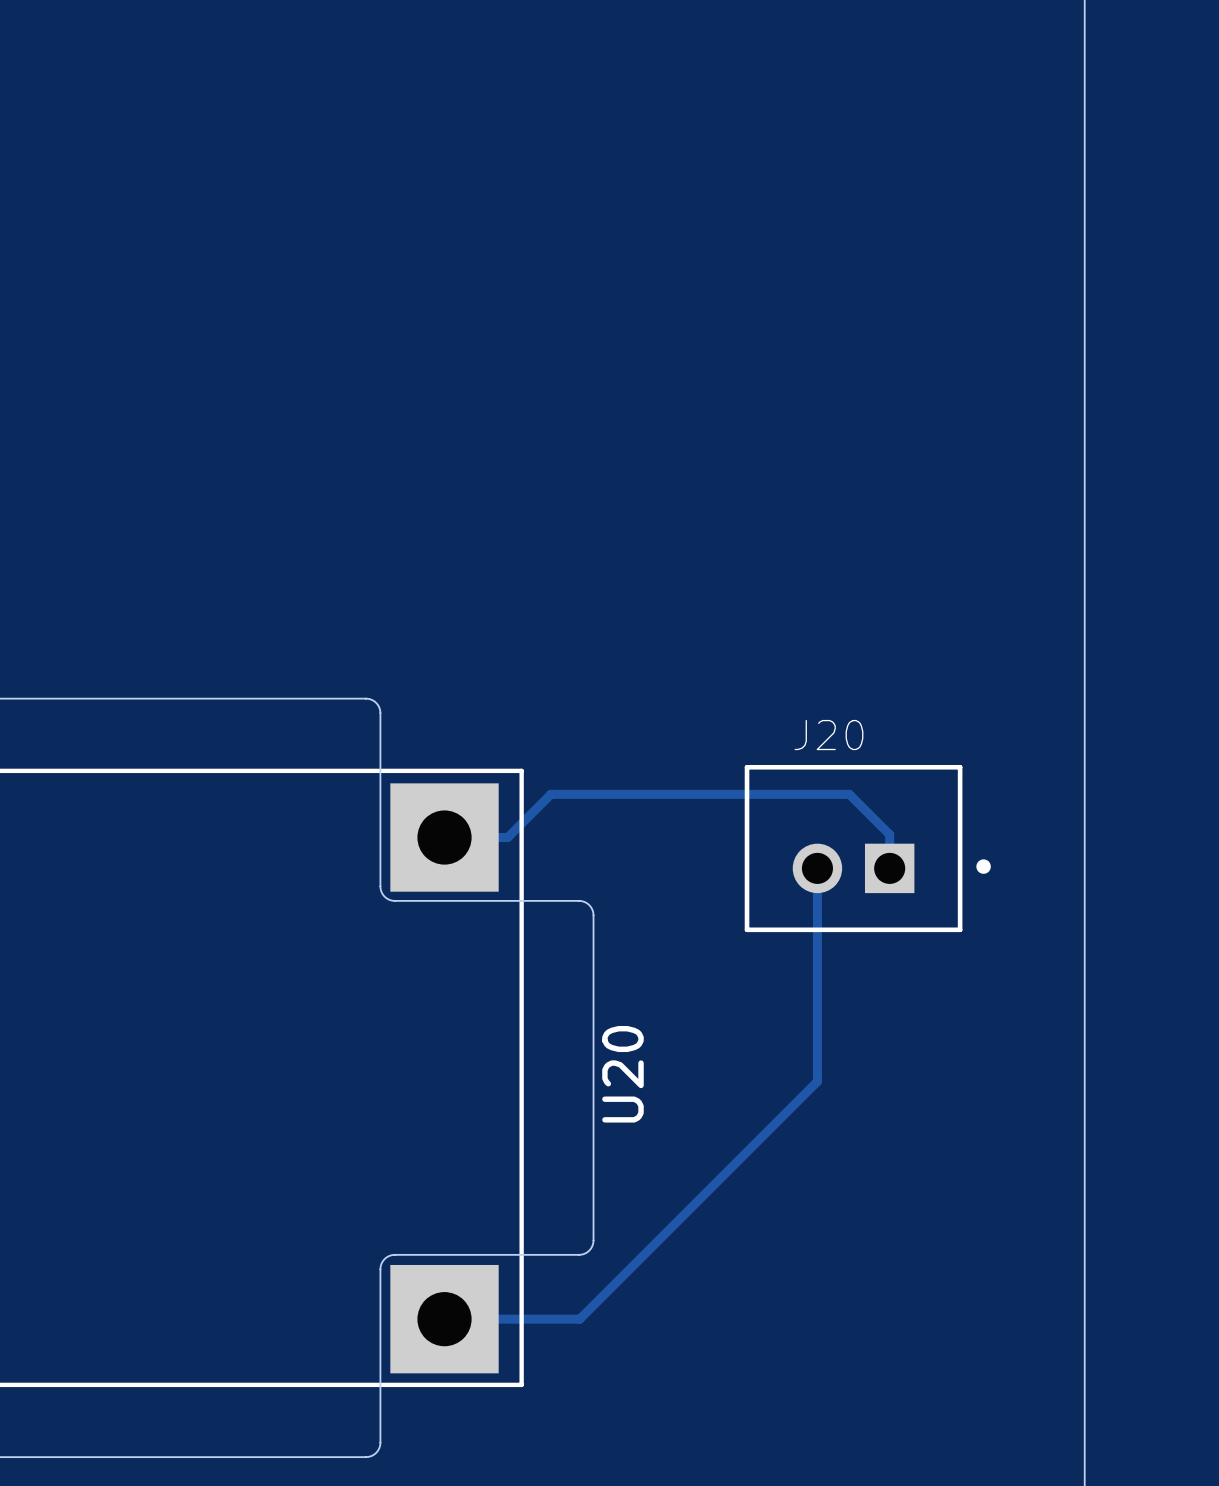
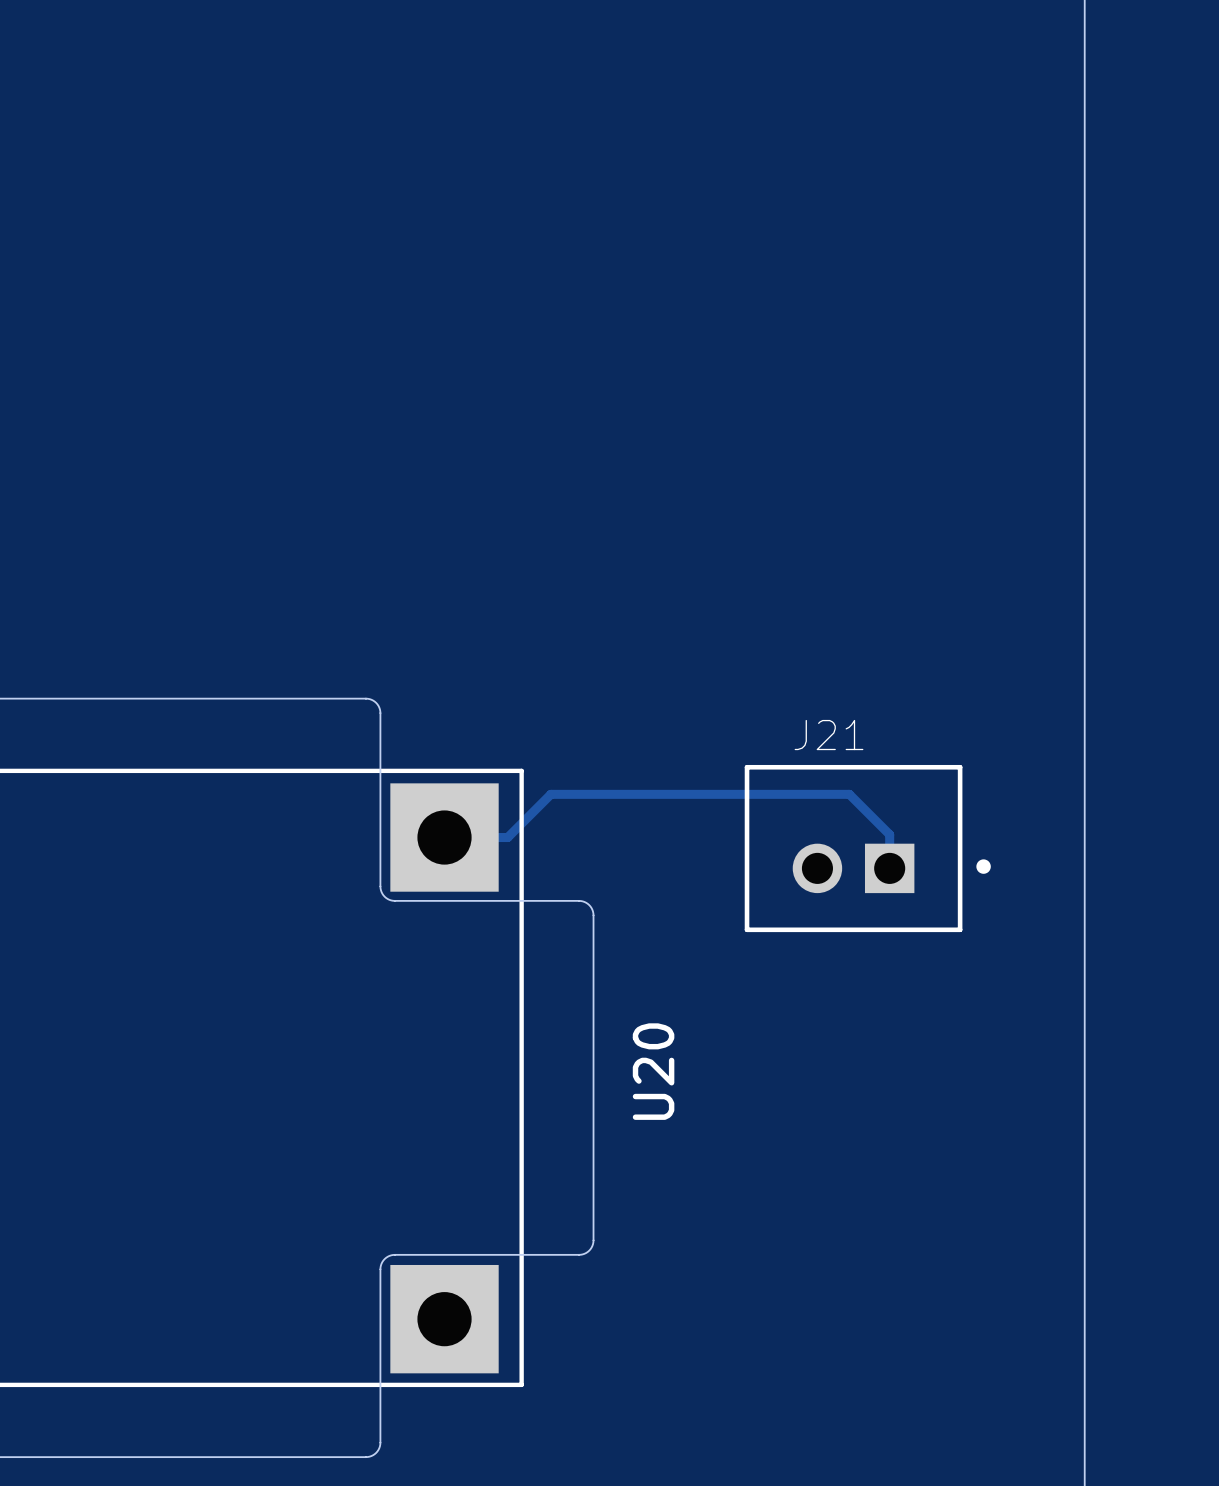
J20 name: J20 (829, 735) -> J21 (829, 735)
track: (817, 868) (817, 1081) (579, 1319) (444, 1319) -> none
U20 name position: U20 (622, 1074) -> U20 (653, 1071)

